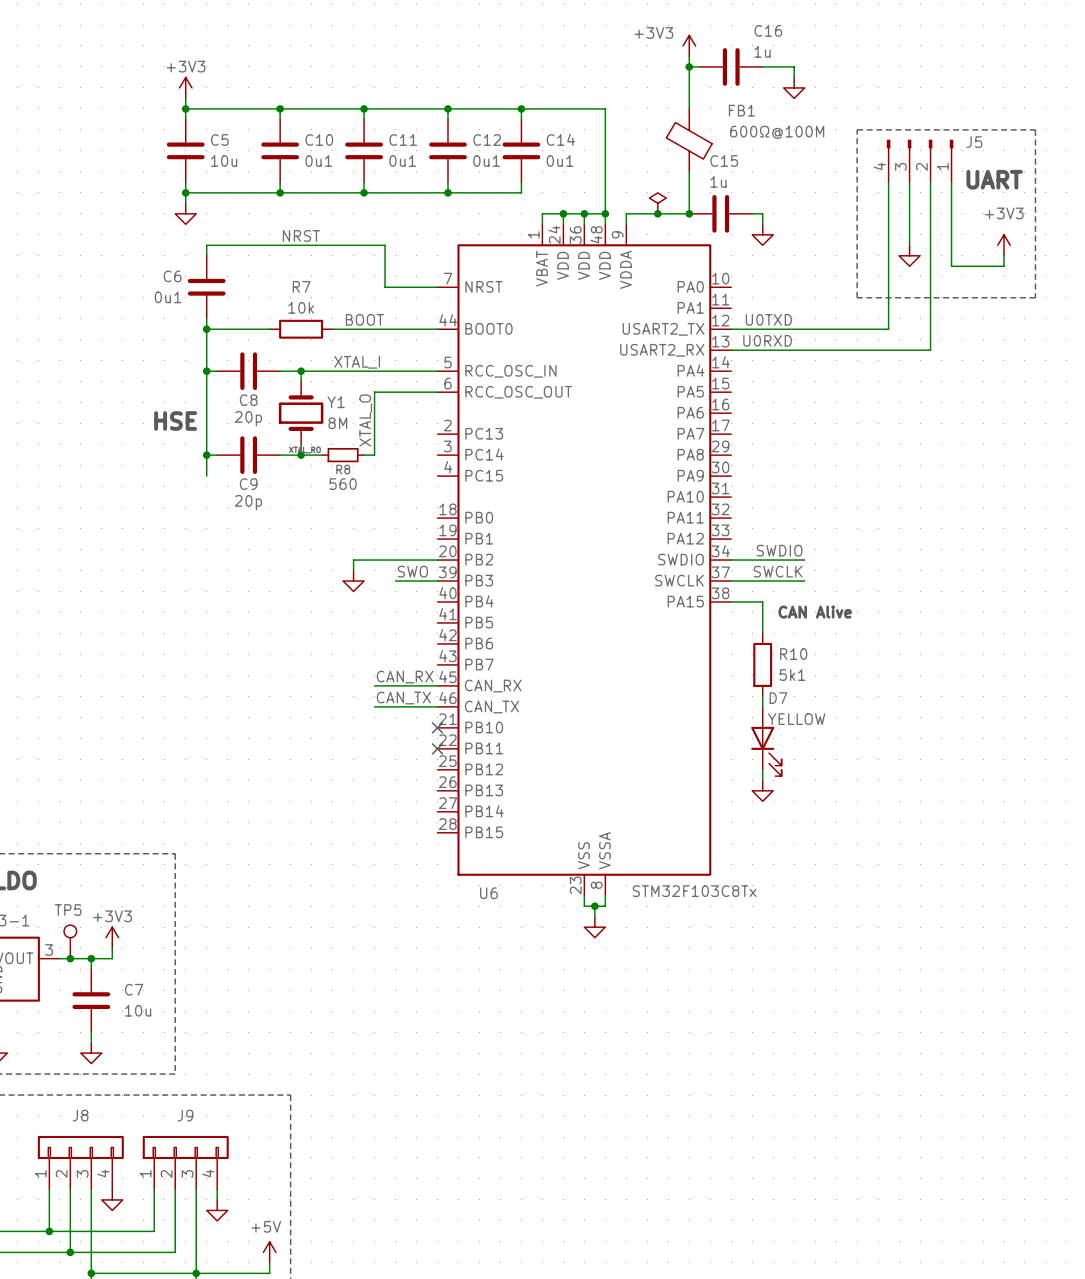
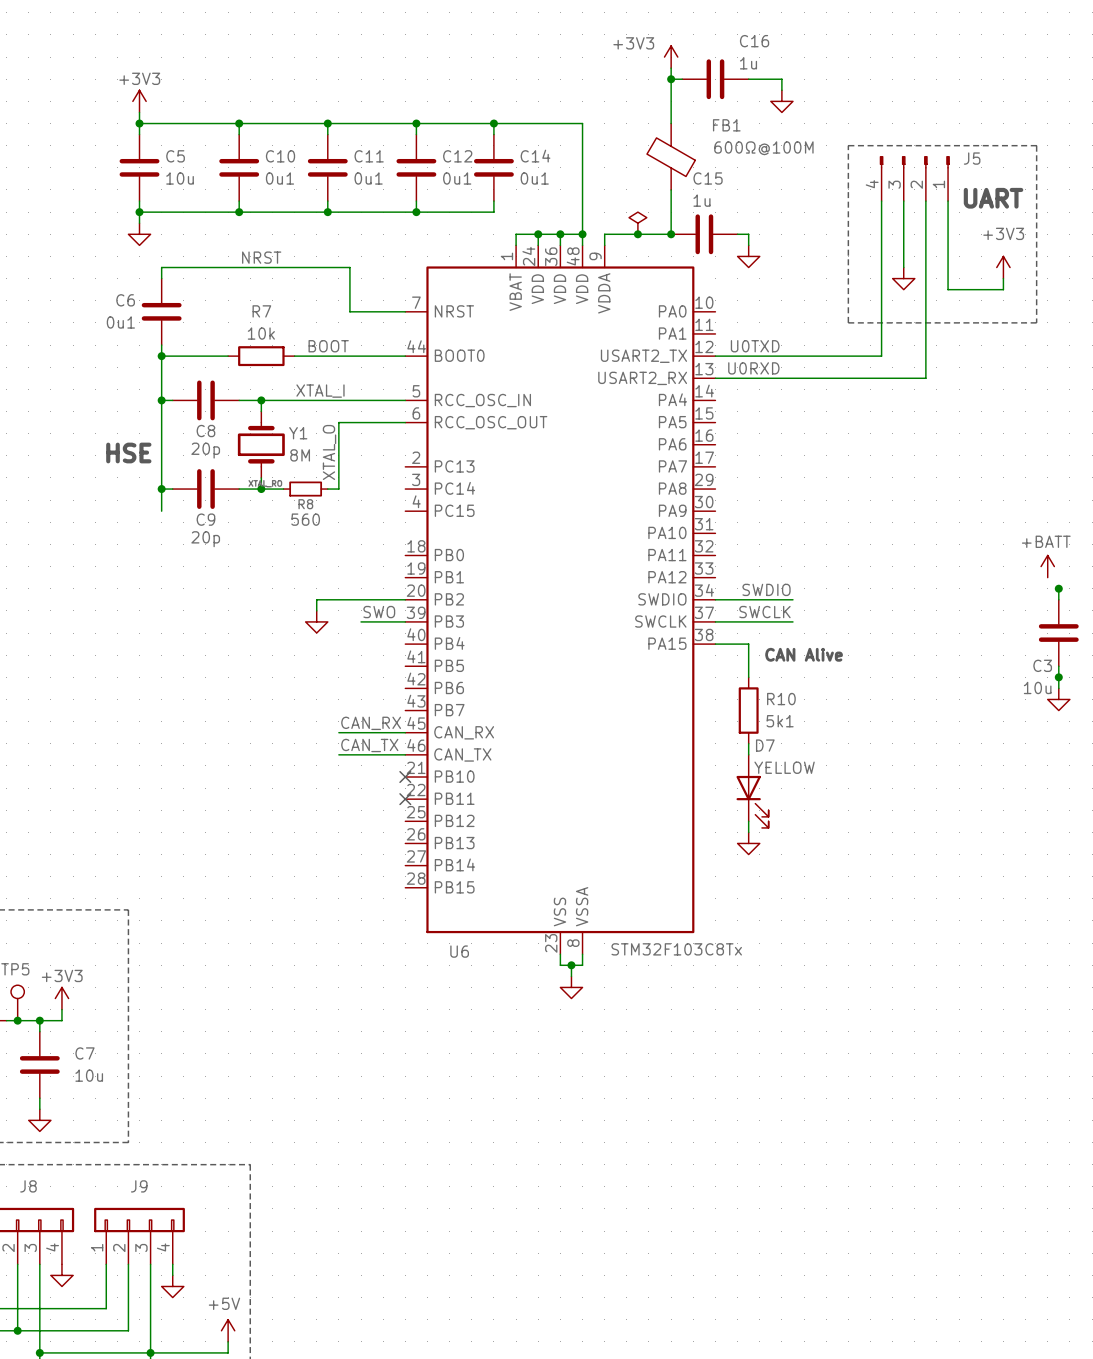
power symbol: none -> +BATT (1047, 566)
wire: none -> (1058, 588) (1058, 599)
junction: none -> (1058, 588)
C3: none -> 10u (1058, 633)
wire: none -> (1058, 666) (1058, 688)
junction: none -> (1058, 677)
power symbol: none -> (1058, 699)

